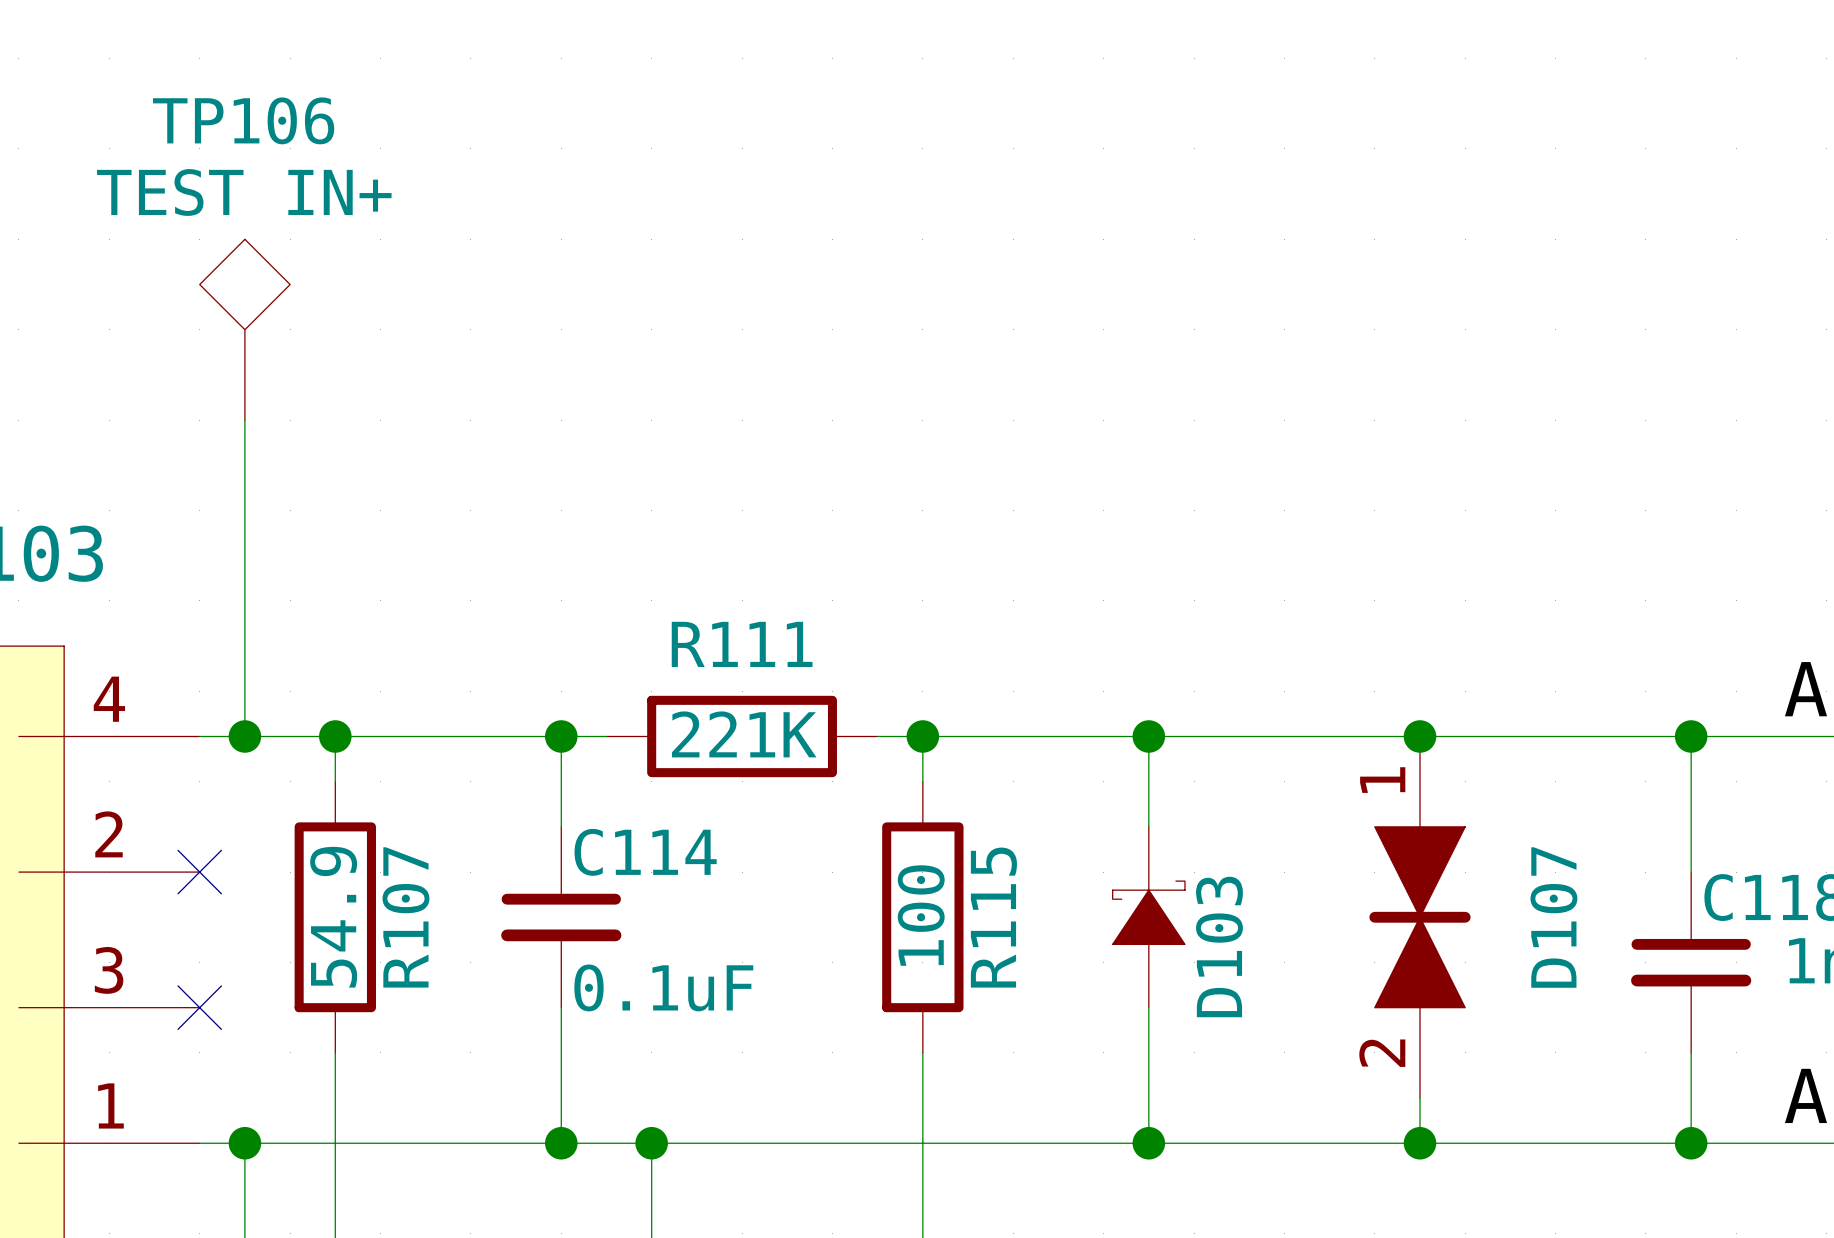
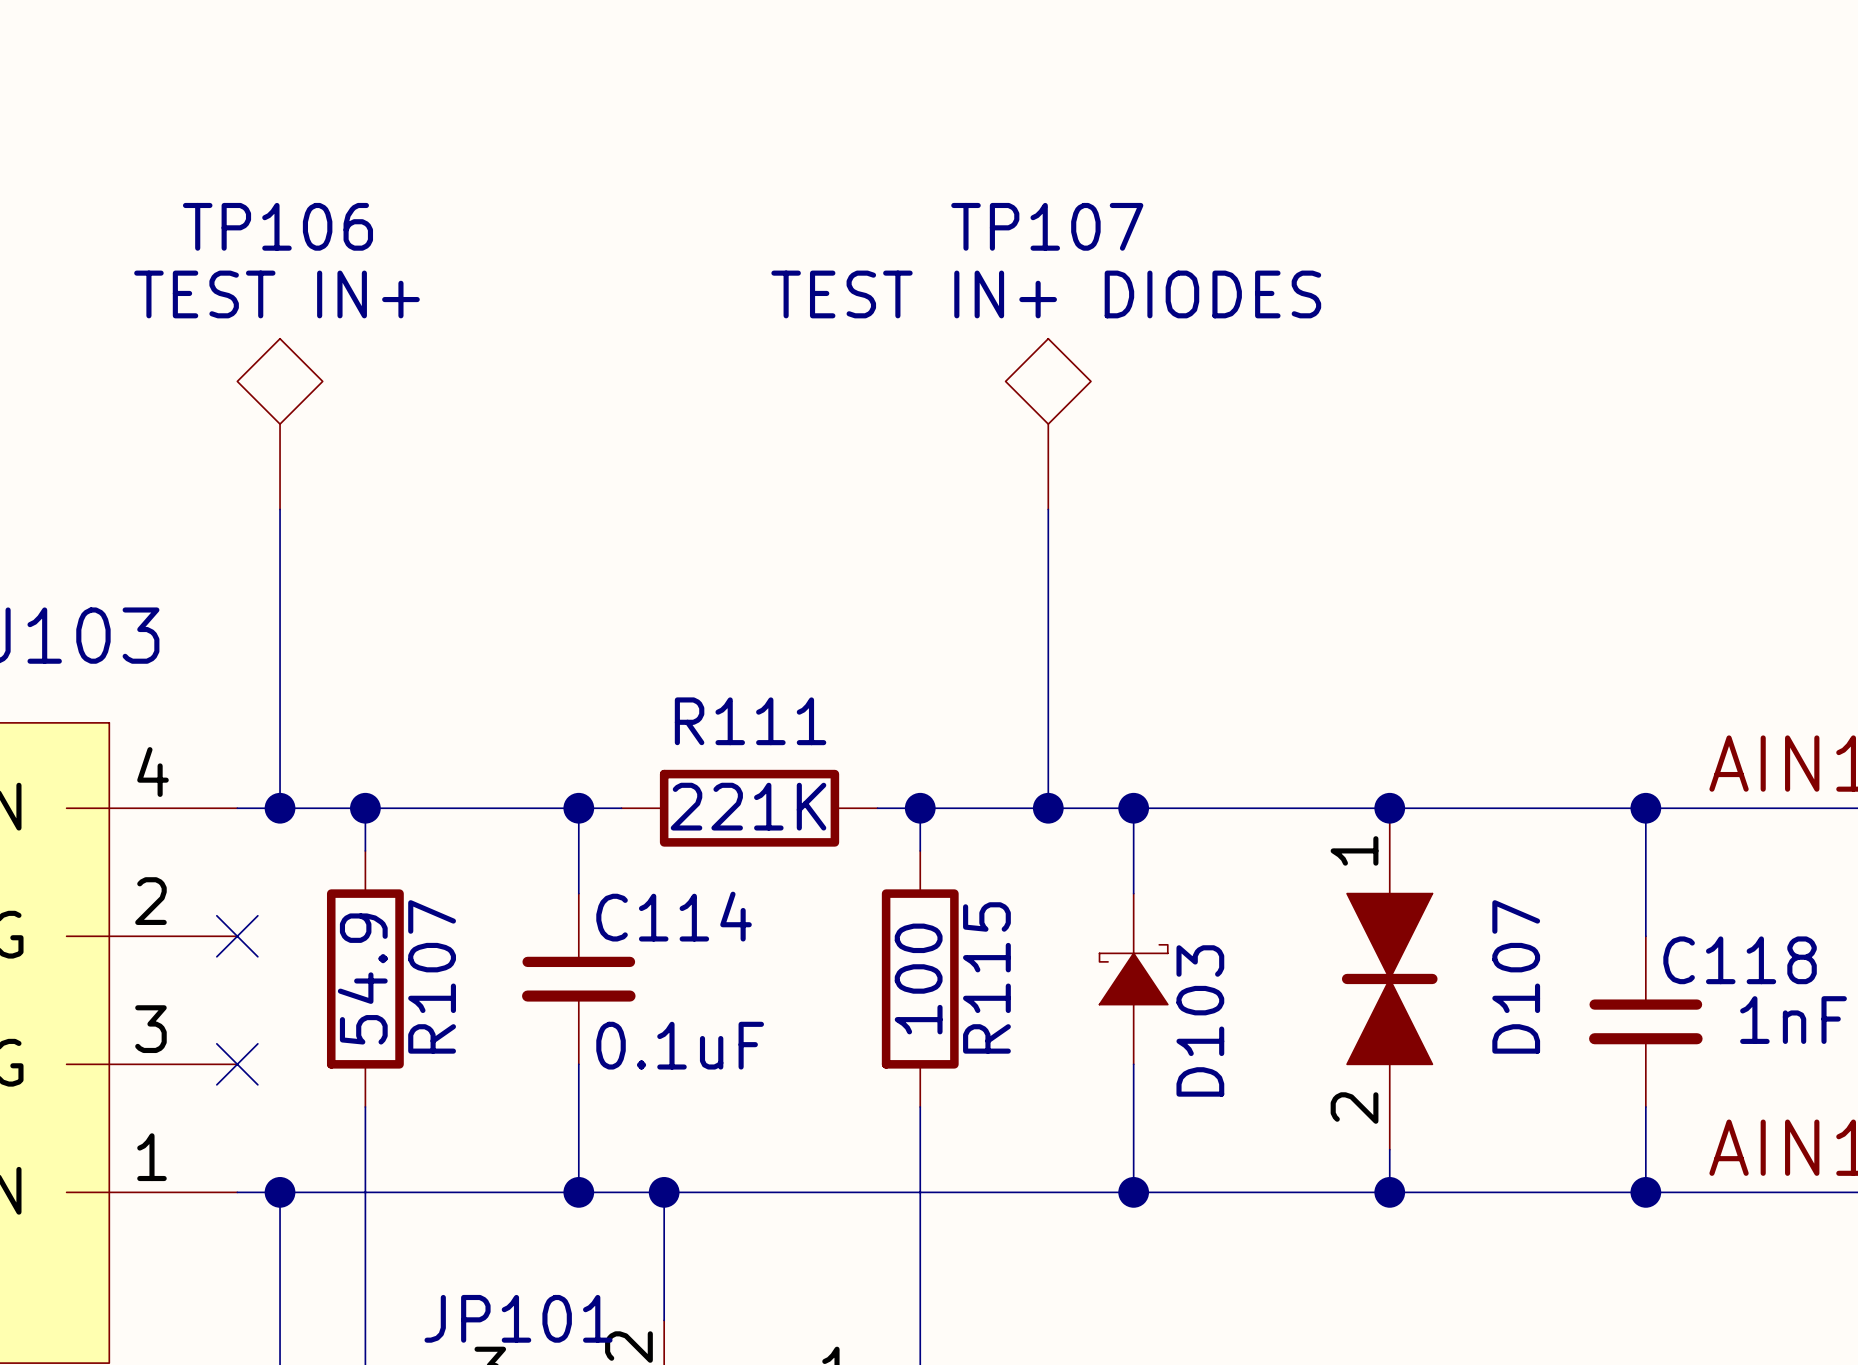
TP107: none -> TEST IN+ DIODES (1048, 424)
wire: none -> (1048, 509) (1048, 808)
junction: none -> (1048, 808)

